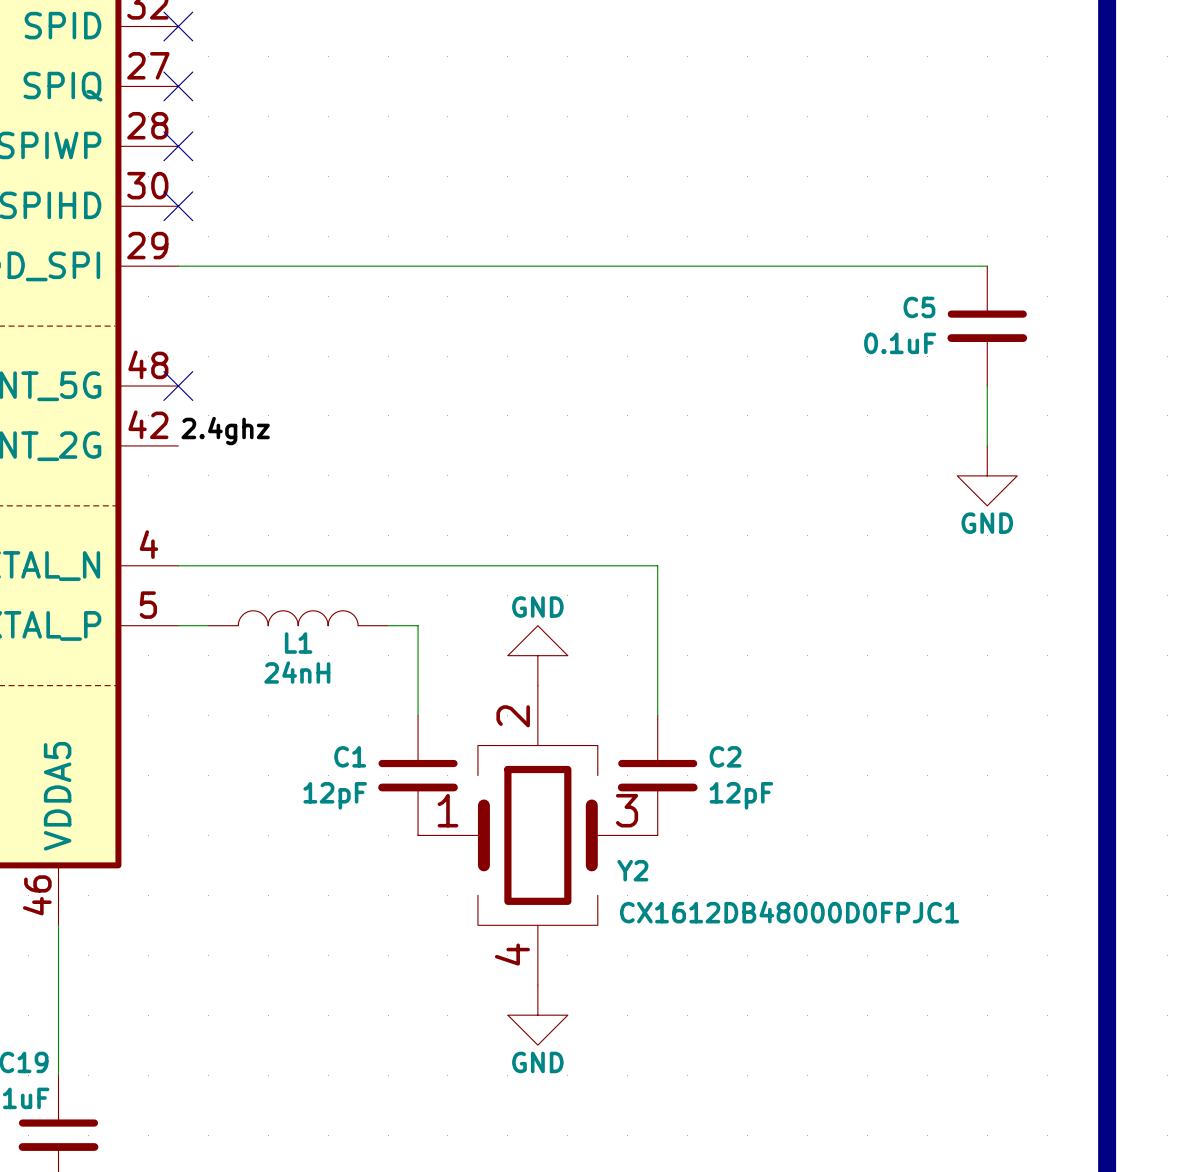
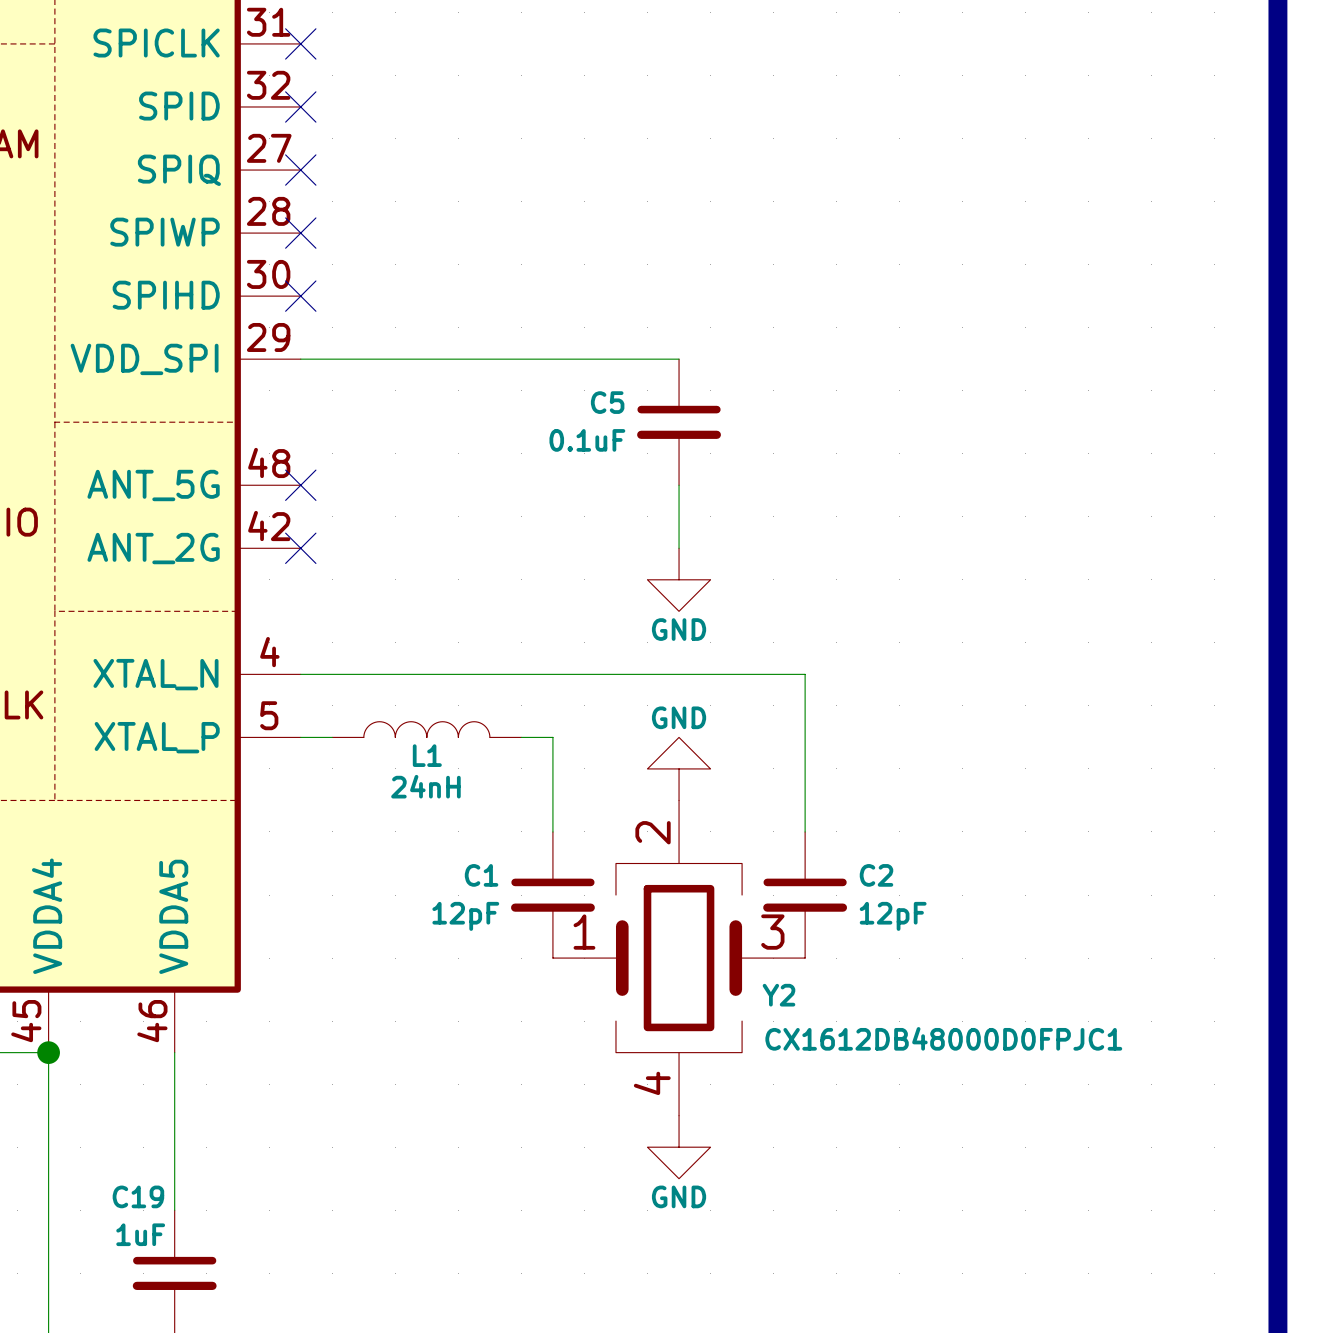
wire: (537, 266) (987, 266) -> none
C5 position: (987, 326) -> (679, 422)
wire: (987, 386) (987, 445) -> (679, 485) (679, 548)
label: 2.4ghz (225, 431) -> none
no-connect mark: none -> (300, 548)
power symbol position: GND (987, 475) -> GND (679, 579)

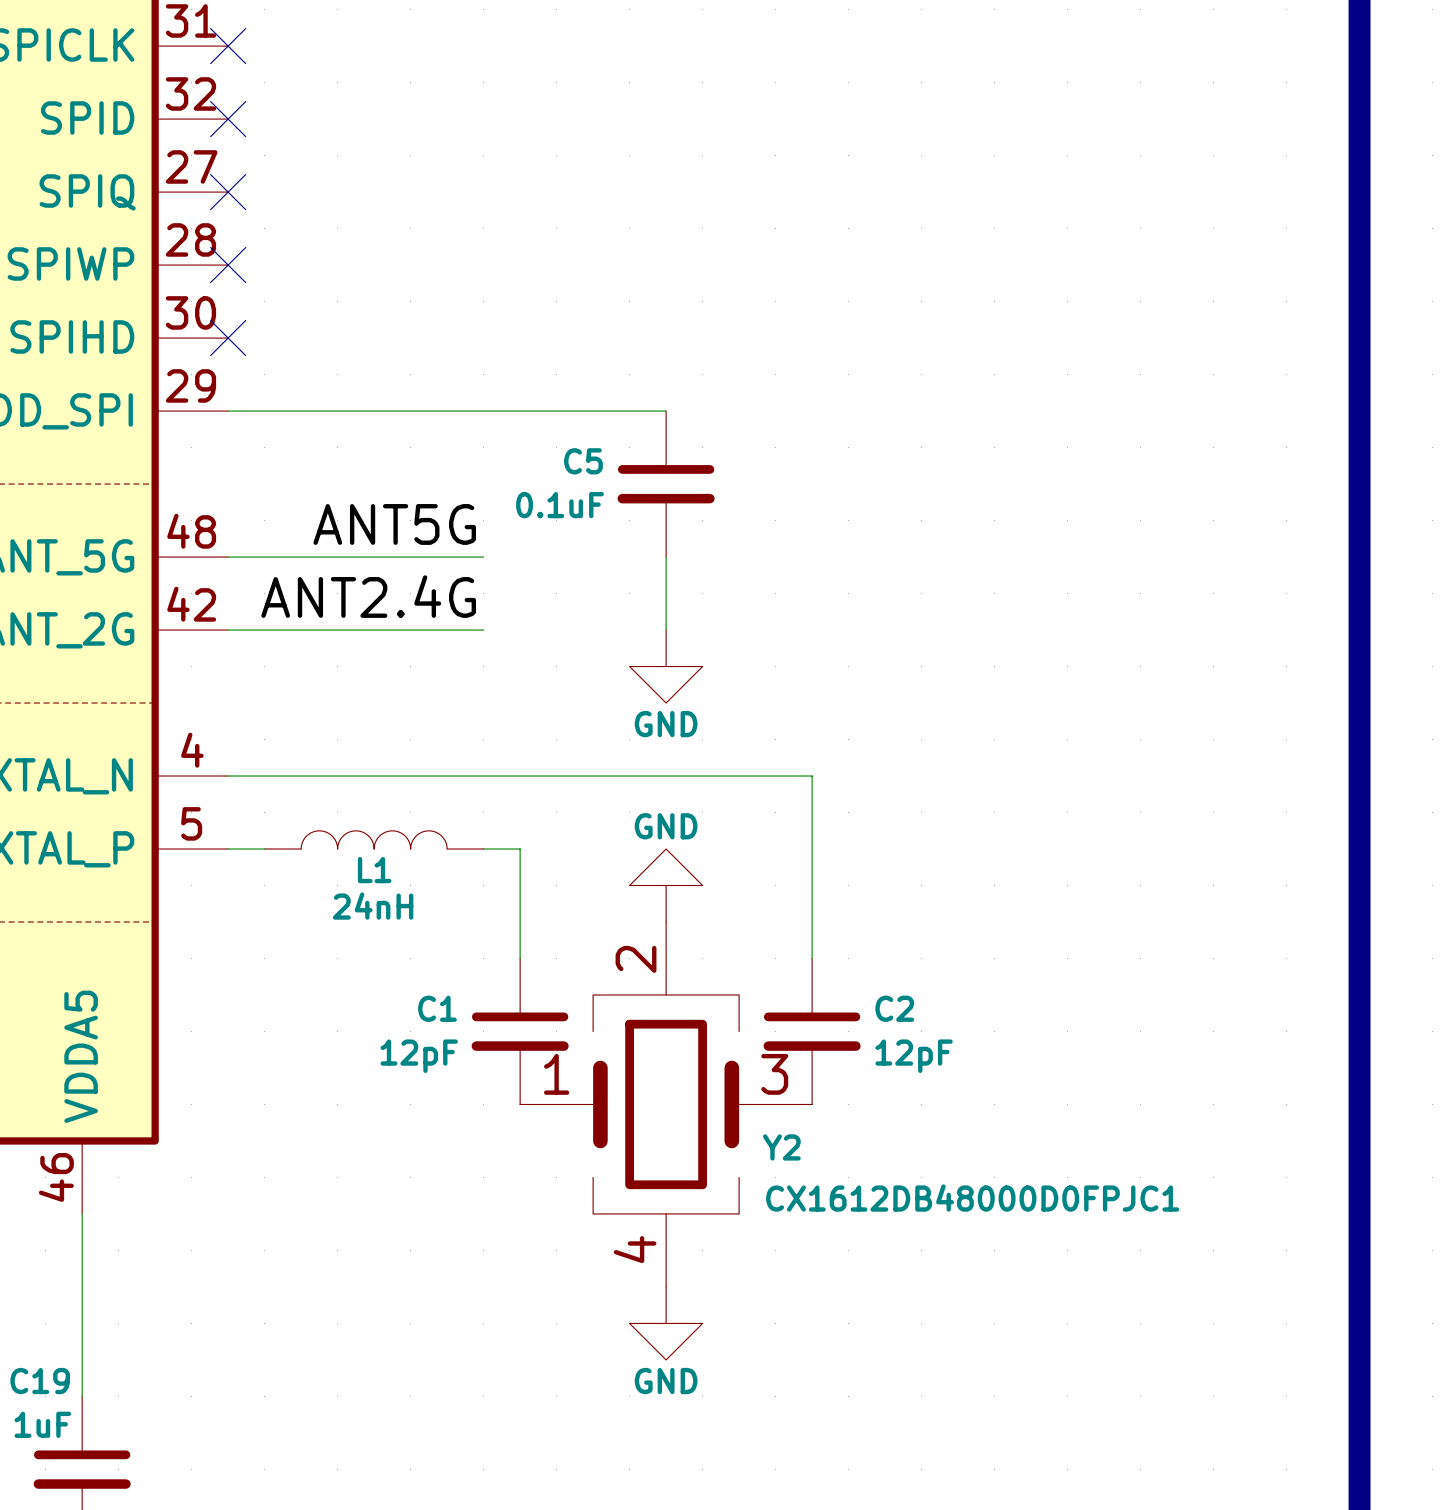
label: none -> ANT5G (394, 524)
wire: none -> (228, 557) (483, 557)
no-connect mark: (300, 485) -> none
label: none -> ANT2.4G (368, 596)
wire: none -> (228, 630) (483, 630)
no-connect mark: (300, 548) -> none

